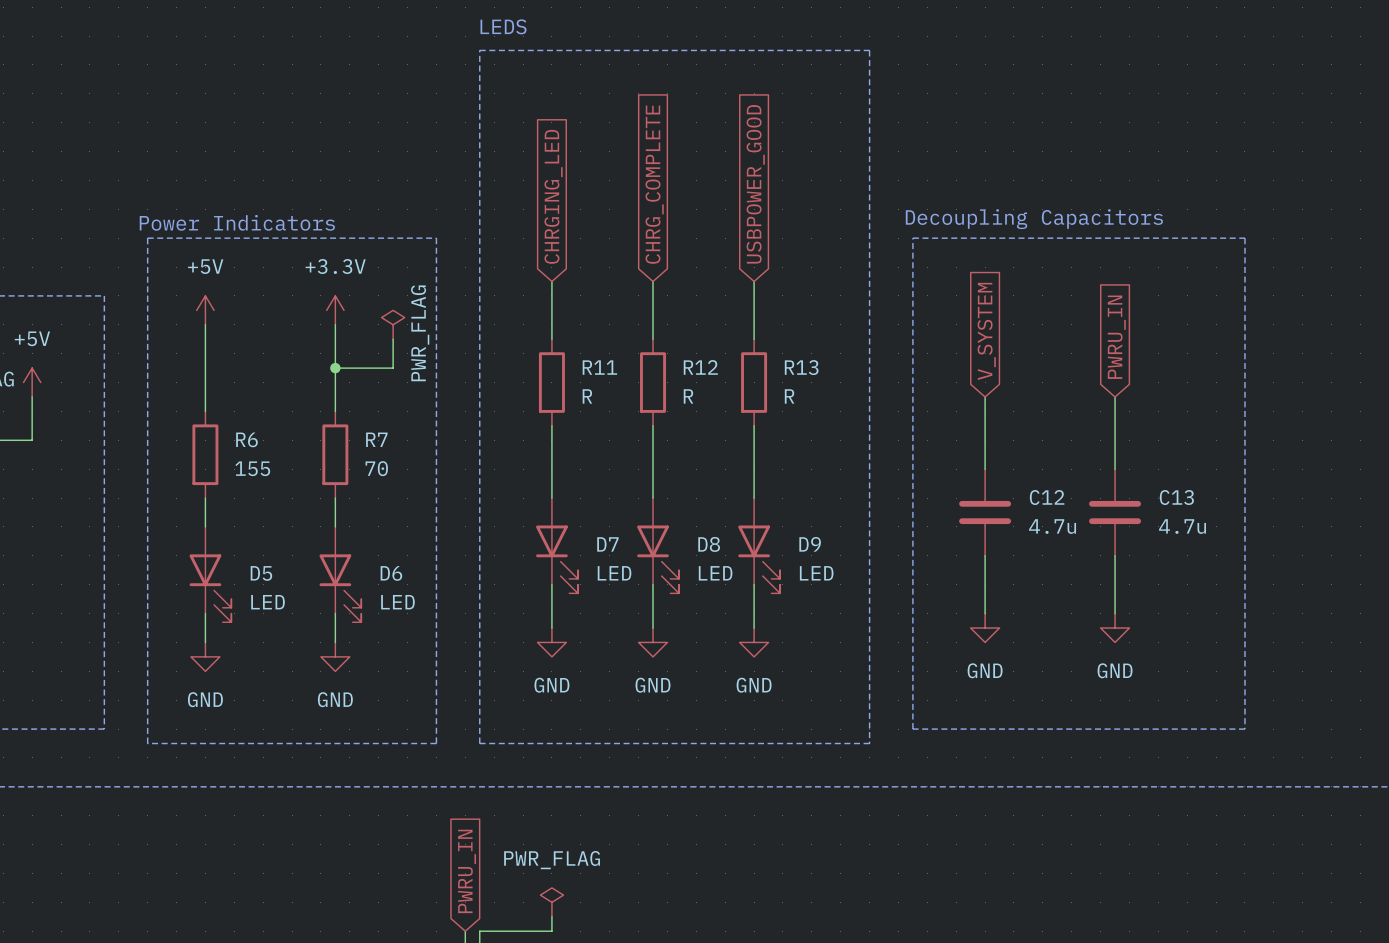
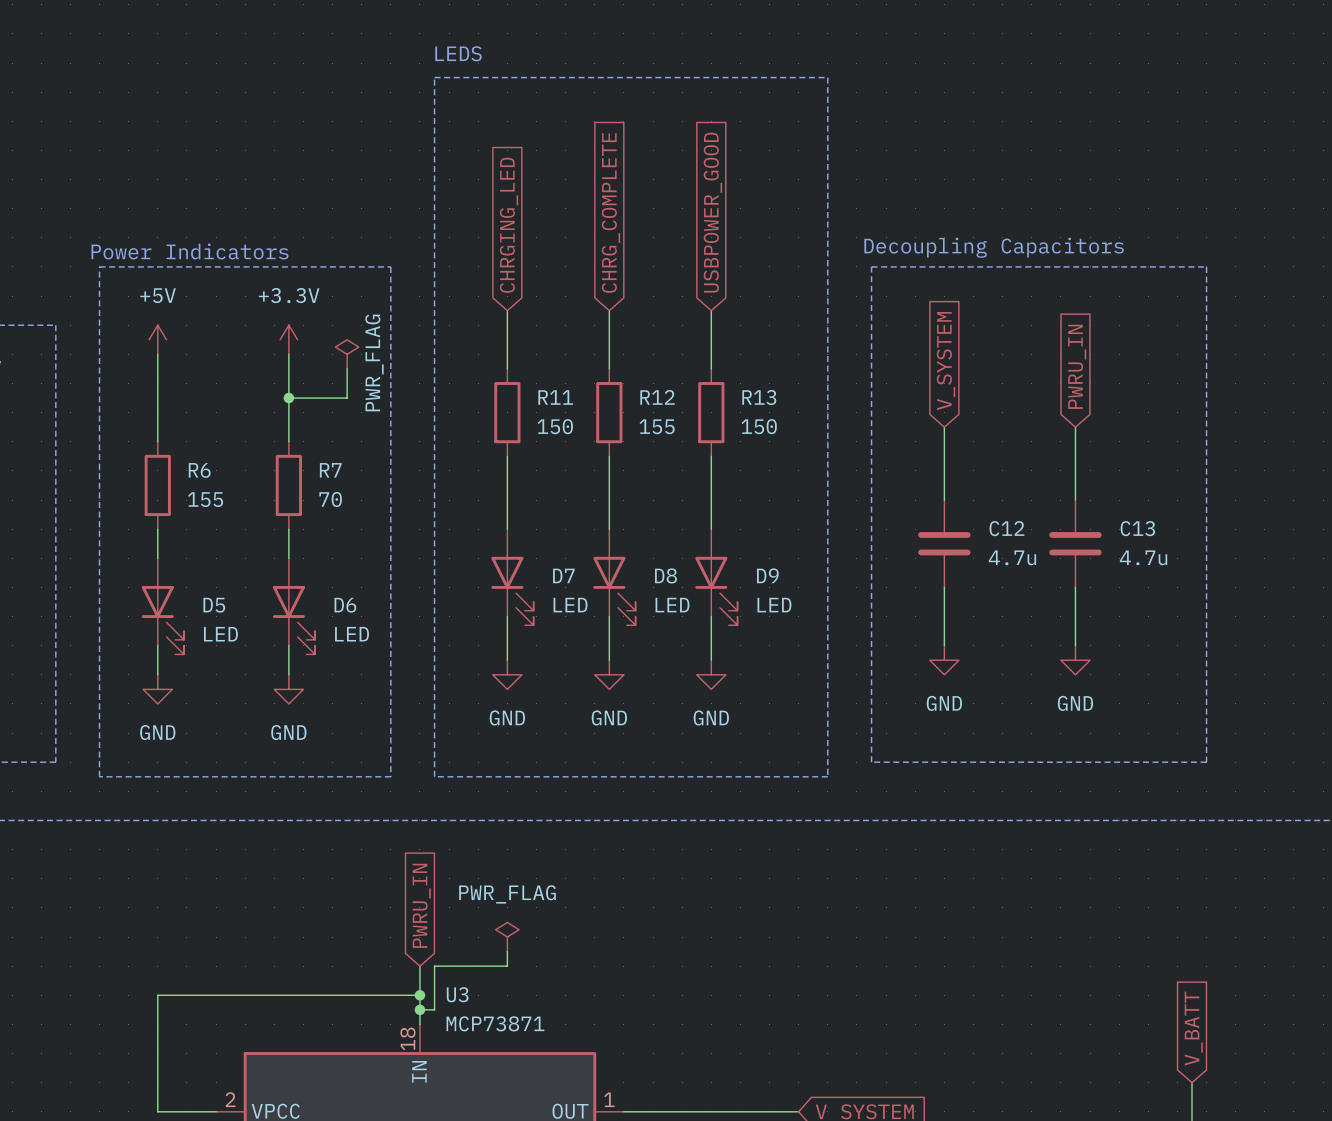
R11 value: R (587, 396) -> 150 (555, 426)
R12 value: R (688, 396) -> 155 (657, 426)
R13 value: R (789, 396) -> 150 (759, 426)

